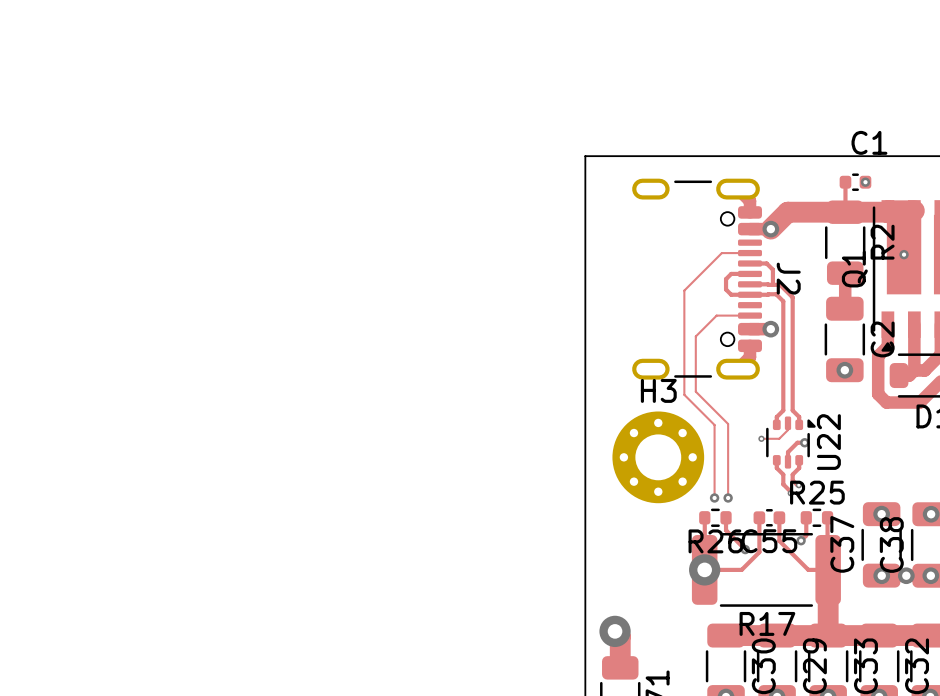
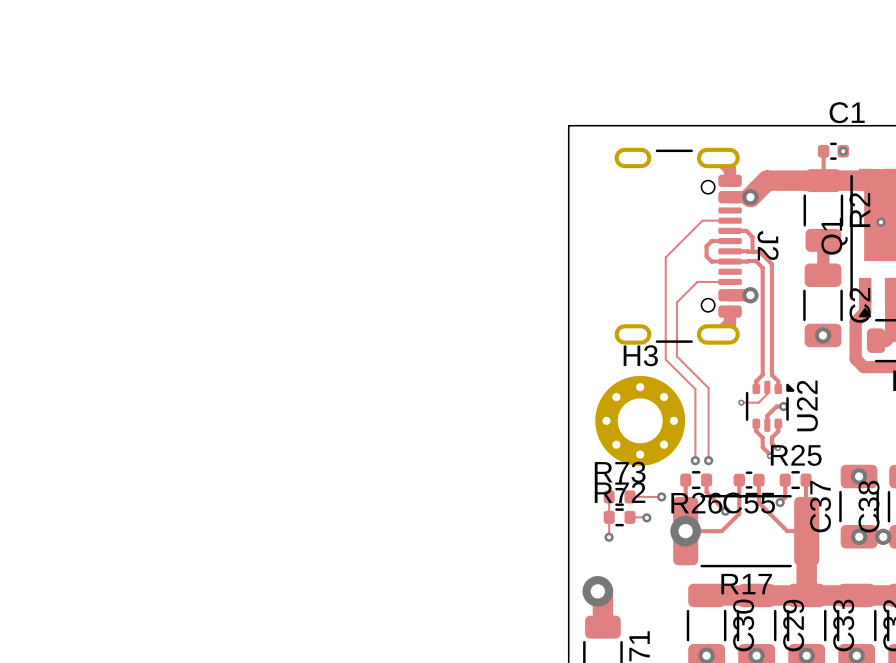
track: none -> (609, 496) (609, 537)
R73: none -> (619, 496)
track: none -> (630, 496) (661, 496)
via: none -> (661, 496)
R72: none -> (619, 517)
track: none -> (630, 517) (646, 517)
via: none -> (646, 517)
via: none -> (609, 537)

